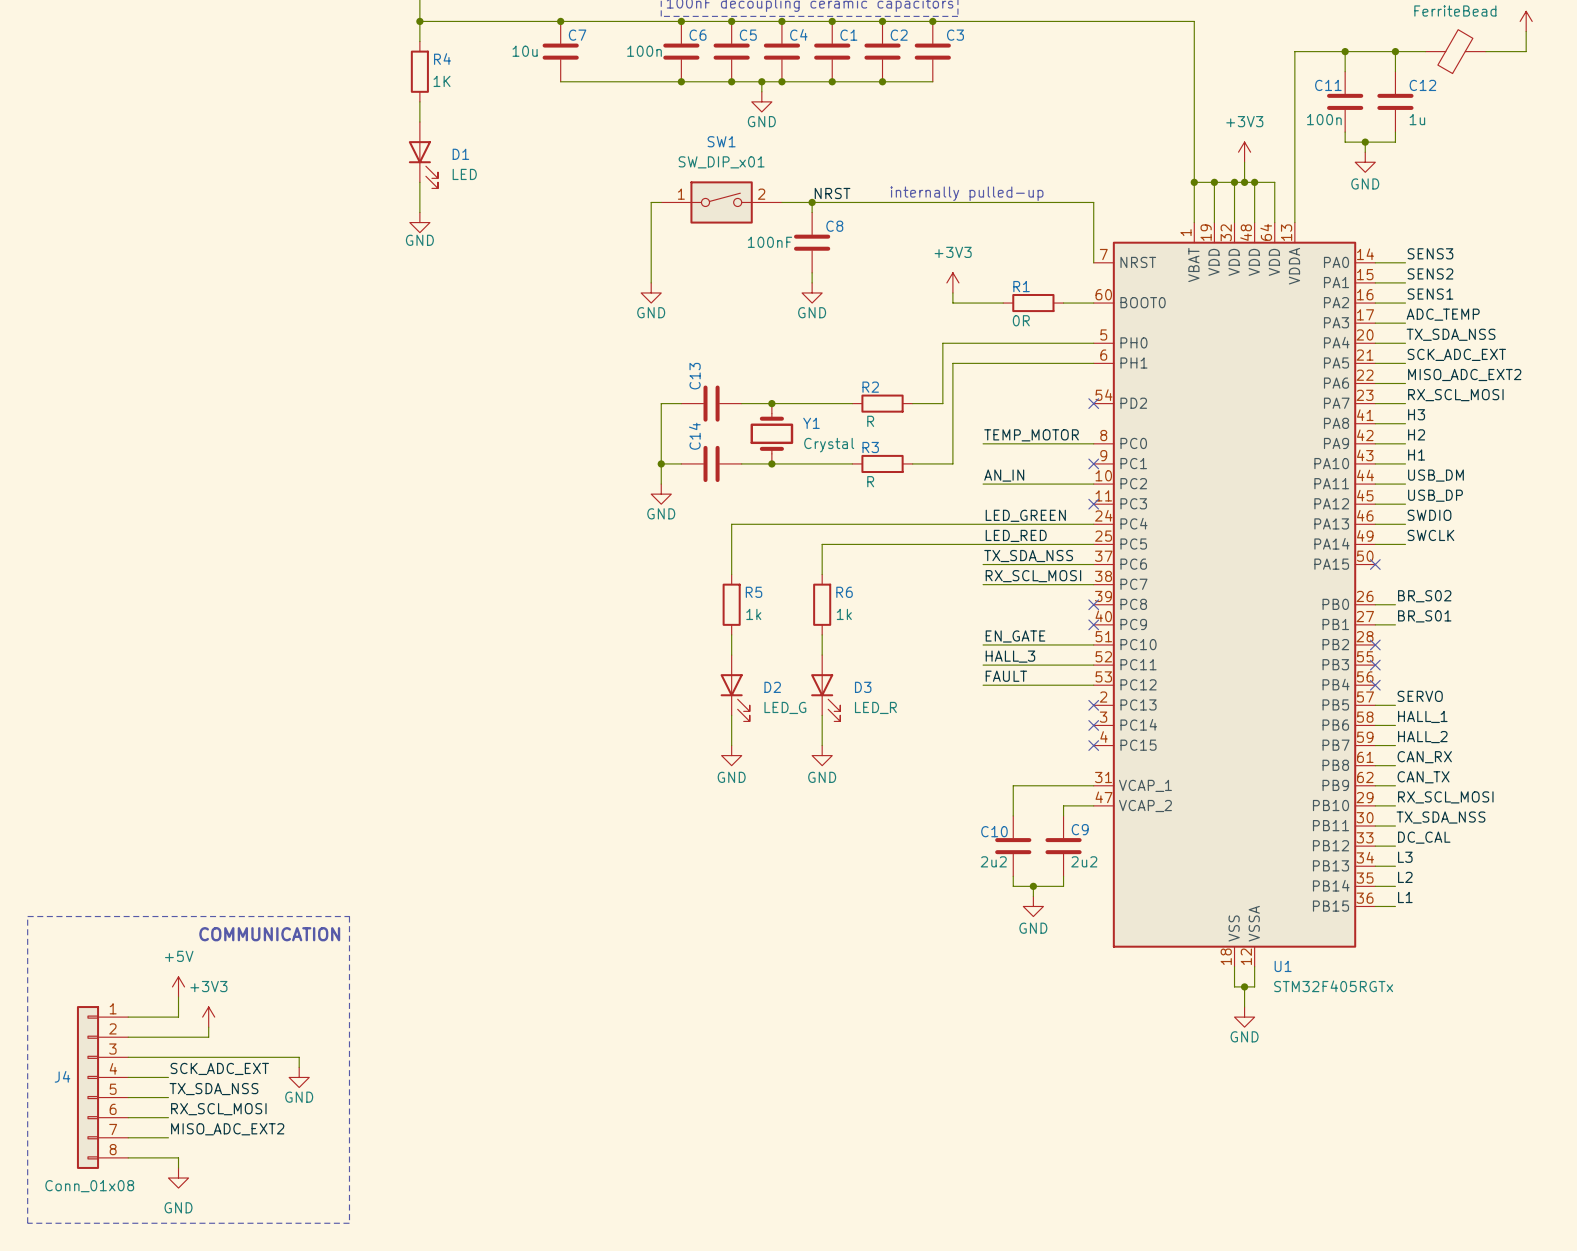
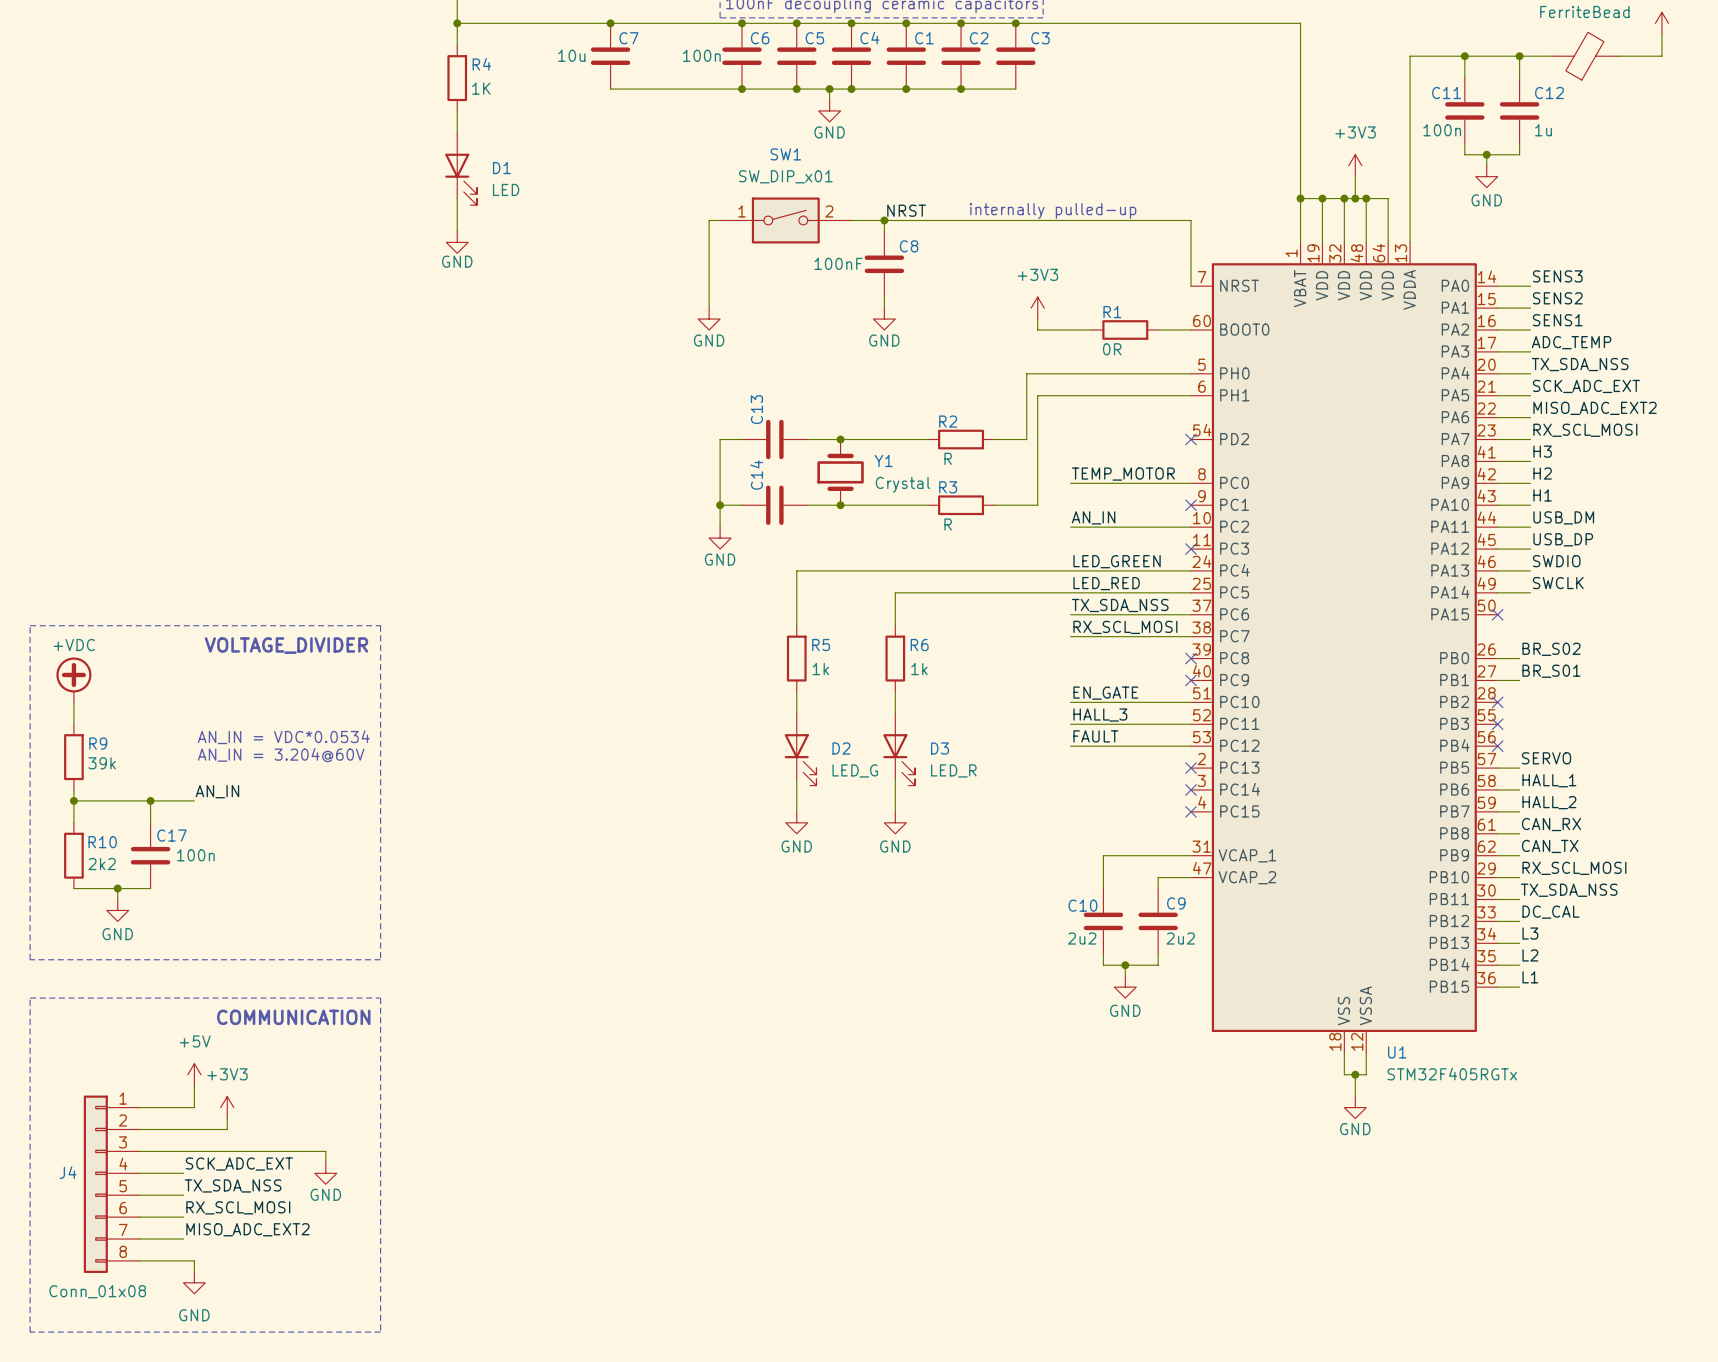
line: none -> (30, 625) (380, 625) (380, 959) (30, 959) (30, 625)
text: none -> VOLTAGE_DIVIDER (286, 645)
power symbol: none -> +VDC (73, 679)
wire: none -> (73, 702) (73, 724)
text: none -> AN_IN = VDC*0.0534 (283, 737)
text: none -> AN_IN = 3.204@60V (281, 755)
R9: none -> 39k (73, 757)
wire: none -> (73, 789) (73, 822)
label: none -> AN_IN (217, 791)
wire: none -> (73, 800) (194, 800)
junction: none -> (73, 800)
wire: none -> (150, 800) (150, 822)
junction: none -> (150, 800)
R10: none -> 2k2 (73, 855)
C17: none -> 100n (150, 855)
wire: none -> (73, 888) (150, 888)
wire: none -> (117, 888) (117, 899)
junction: none -> (117, 888)
power symbol: none -> GND (117, 910)

